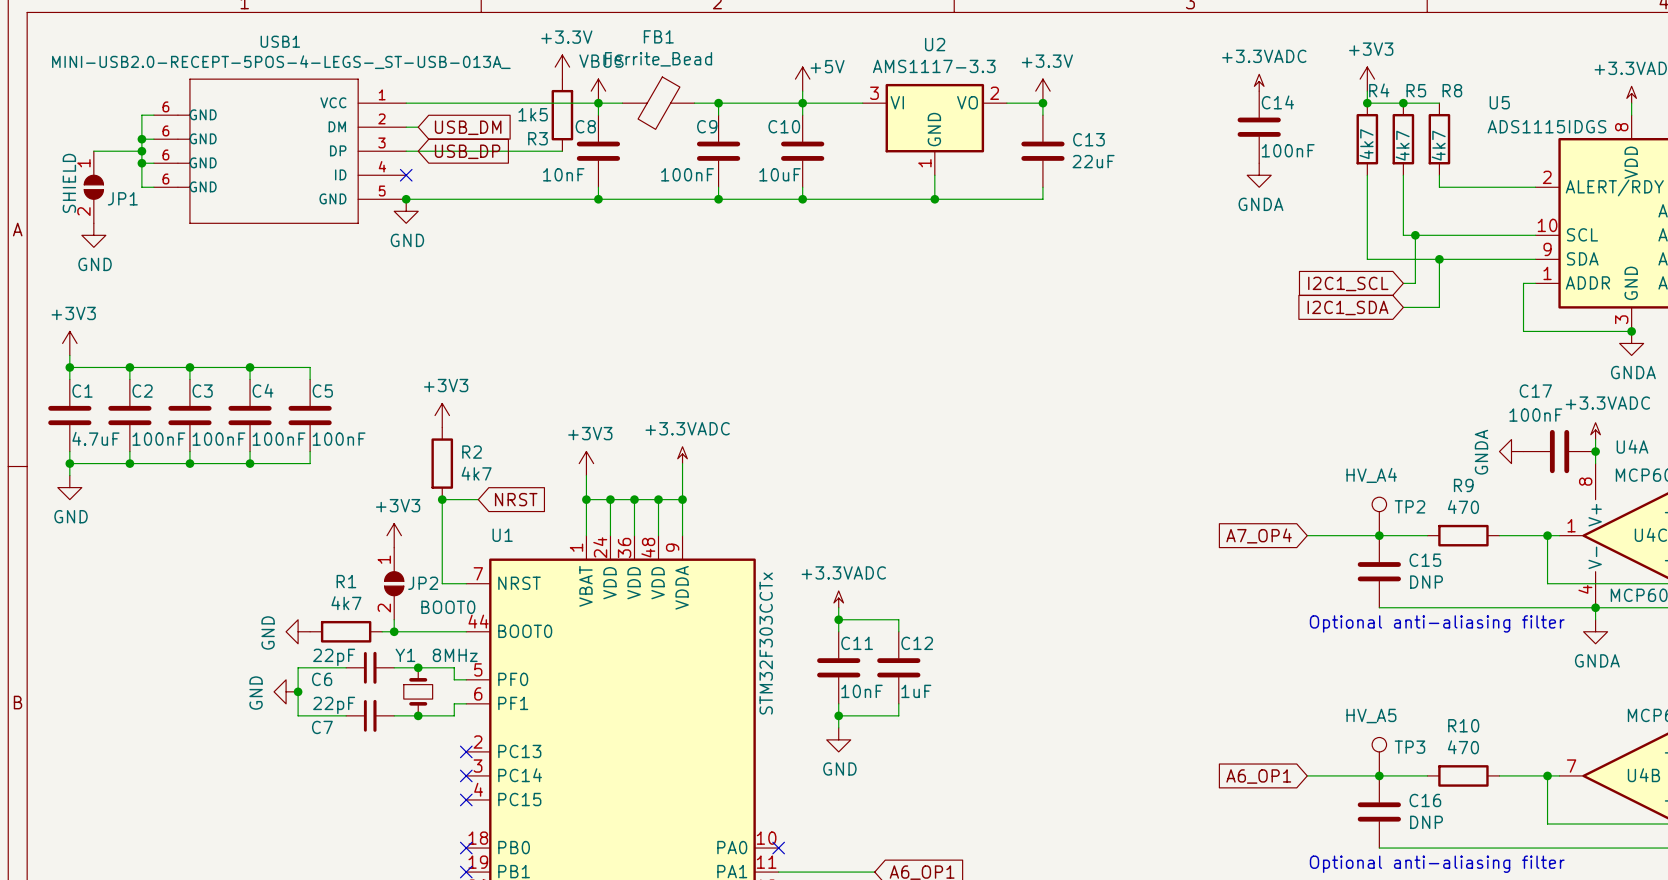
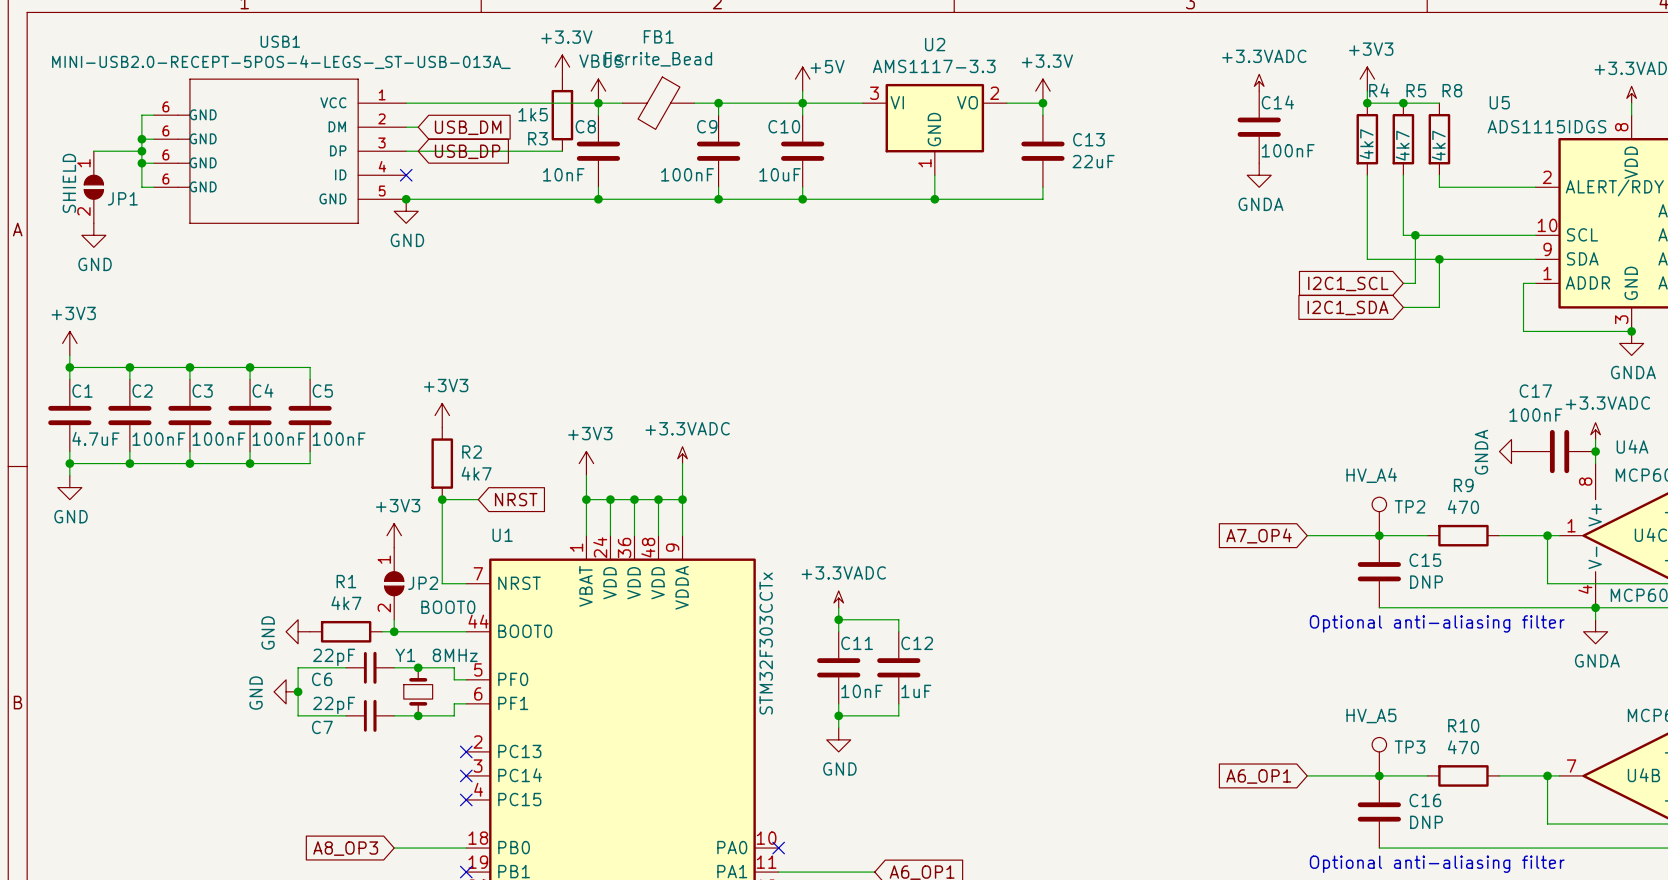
global label: none -> A8_OP3 (345, 848)
wire: none -> (394, 848) (466, 848)
no-connect mark: (466, 848) -> none

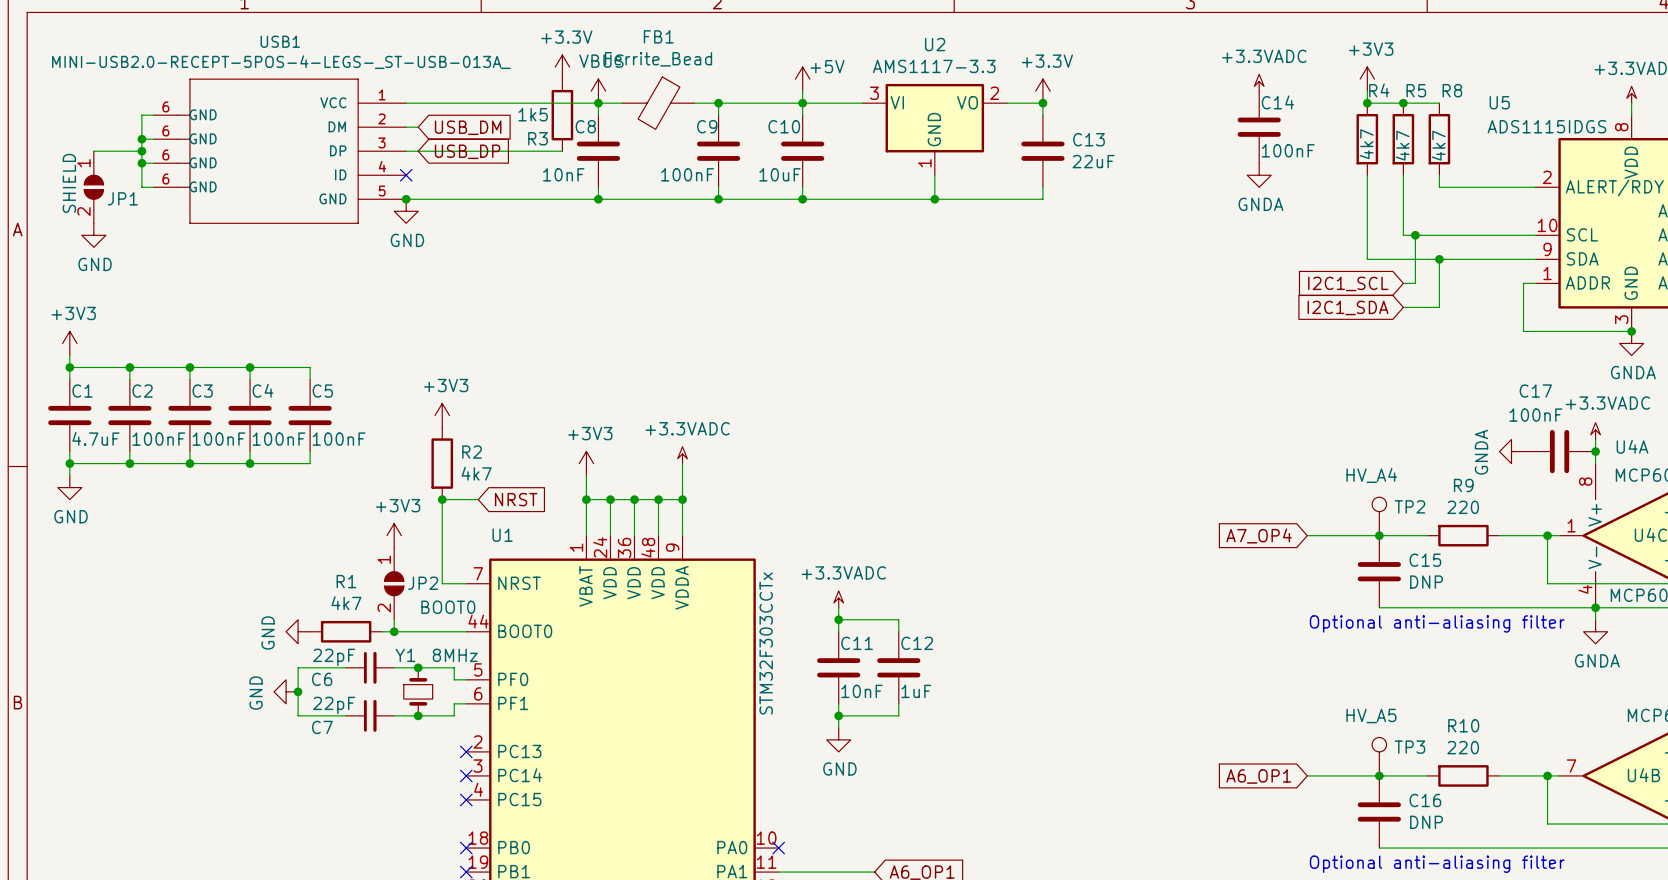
R9 value: 470 (1463, 507) -> 220 (1463, 507)
R10 value: 470 (1463, 747) -> 220 (1463, 747)
global label: A8_OP3 (345, 848) -> none
wire: (394, 848) (466, 848) -> none
no-connect mark: none -> (466, 848)

